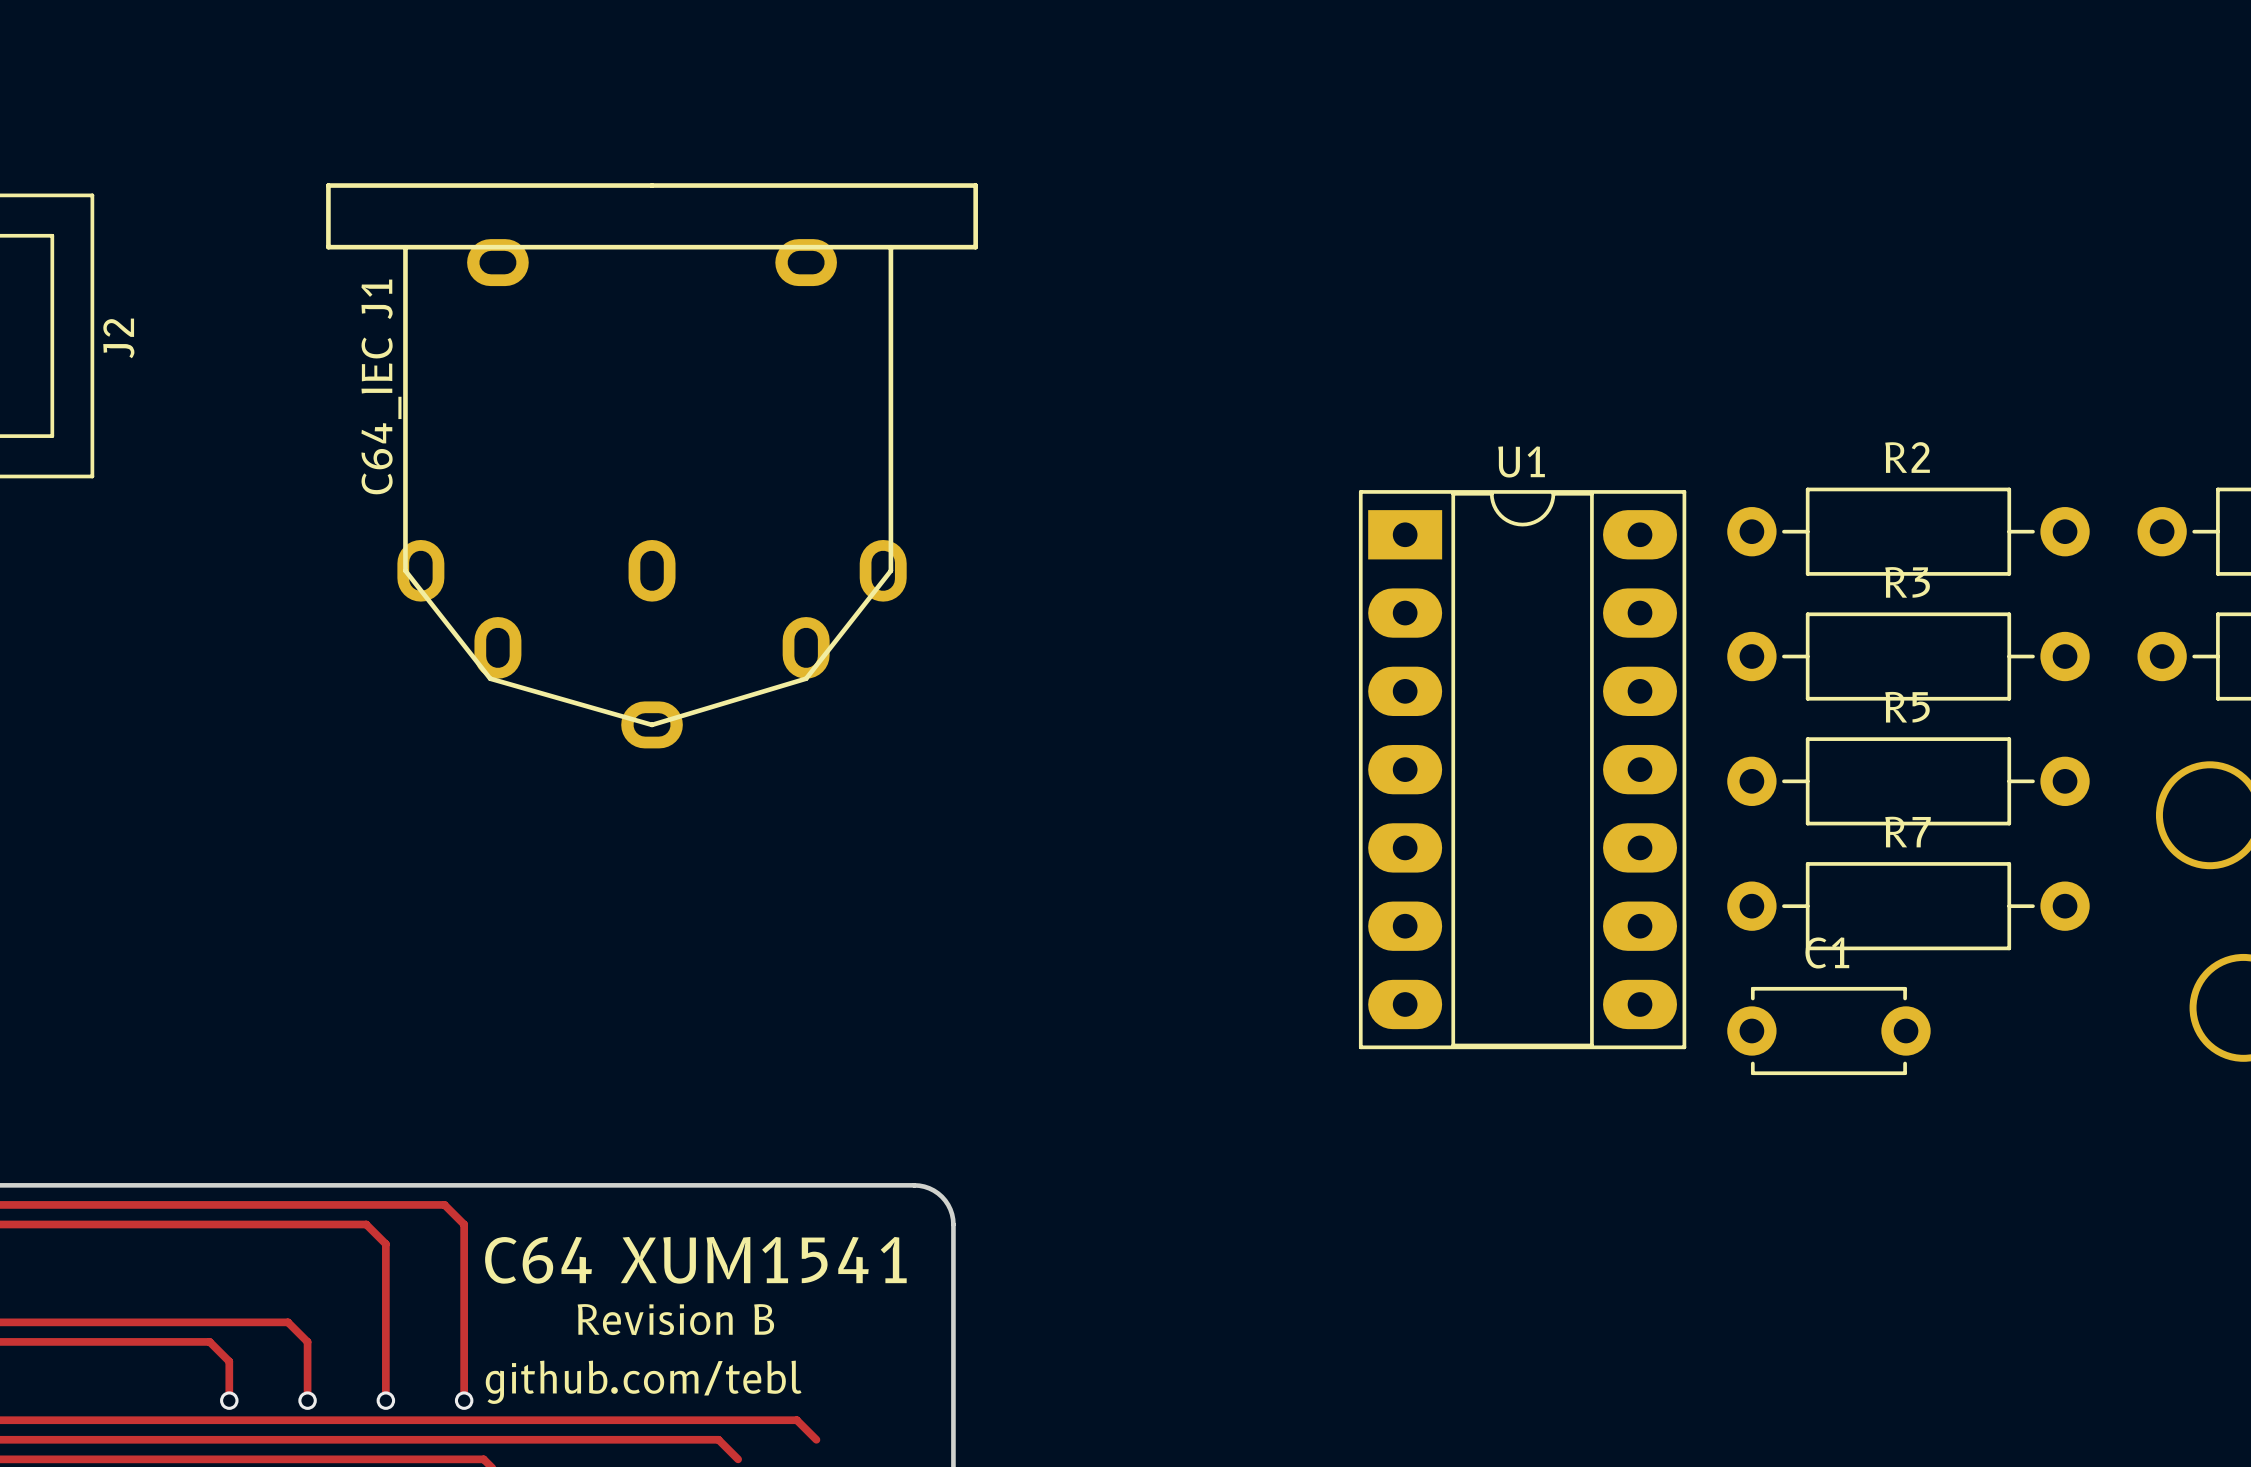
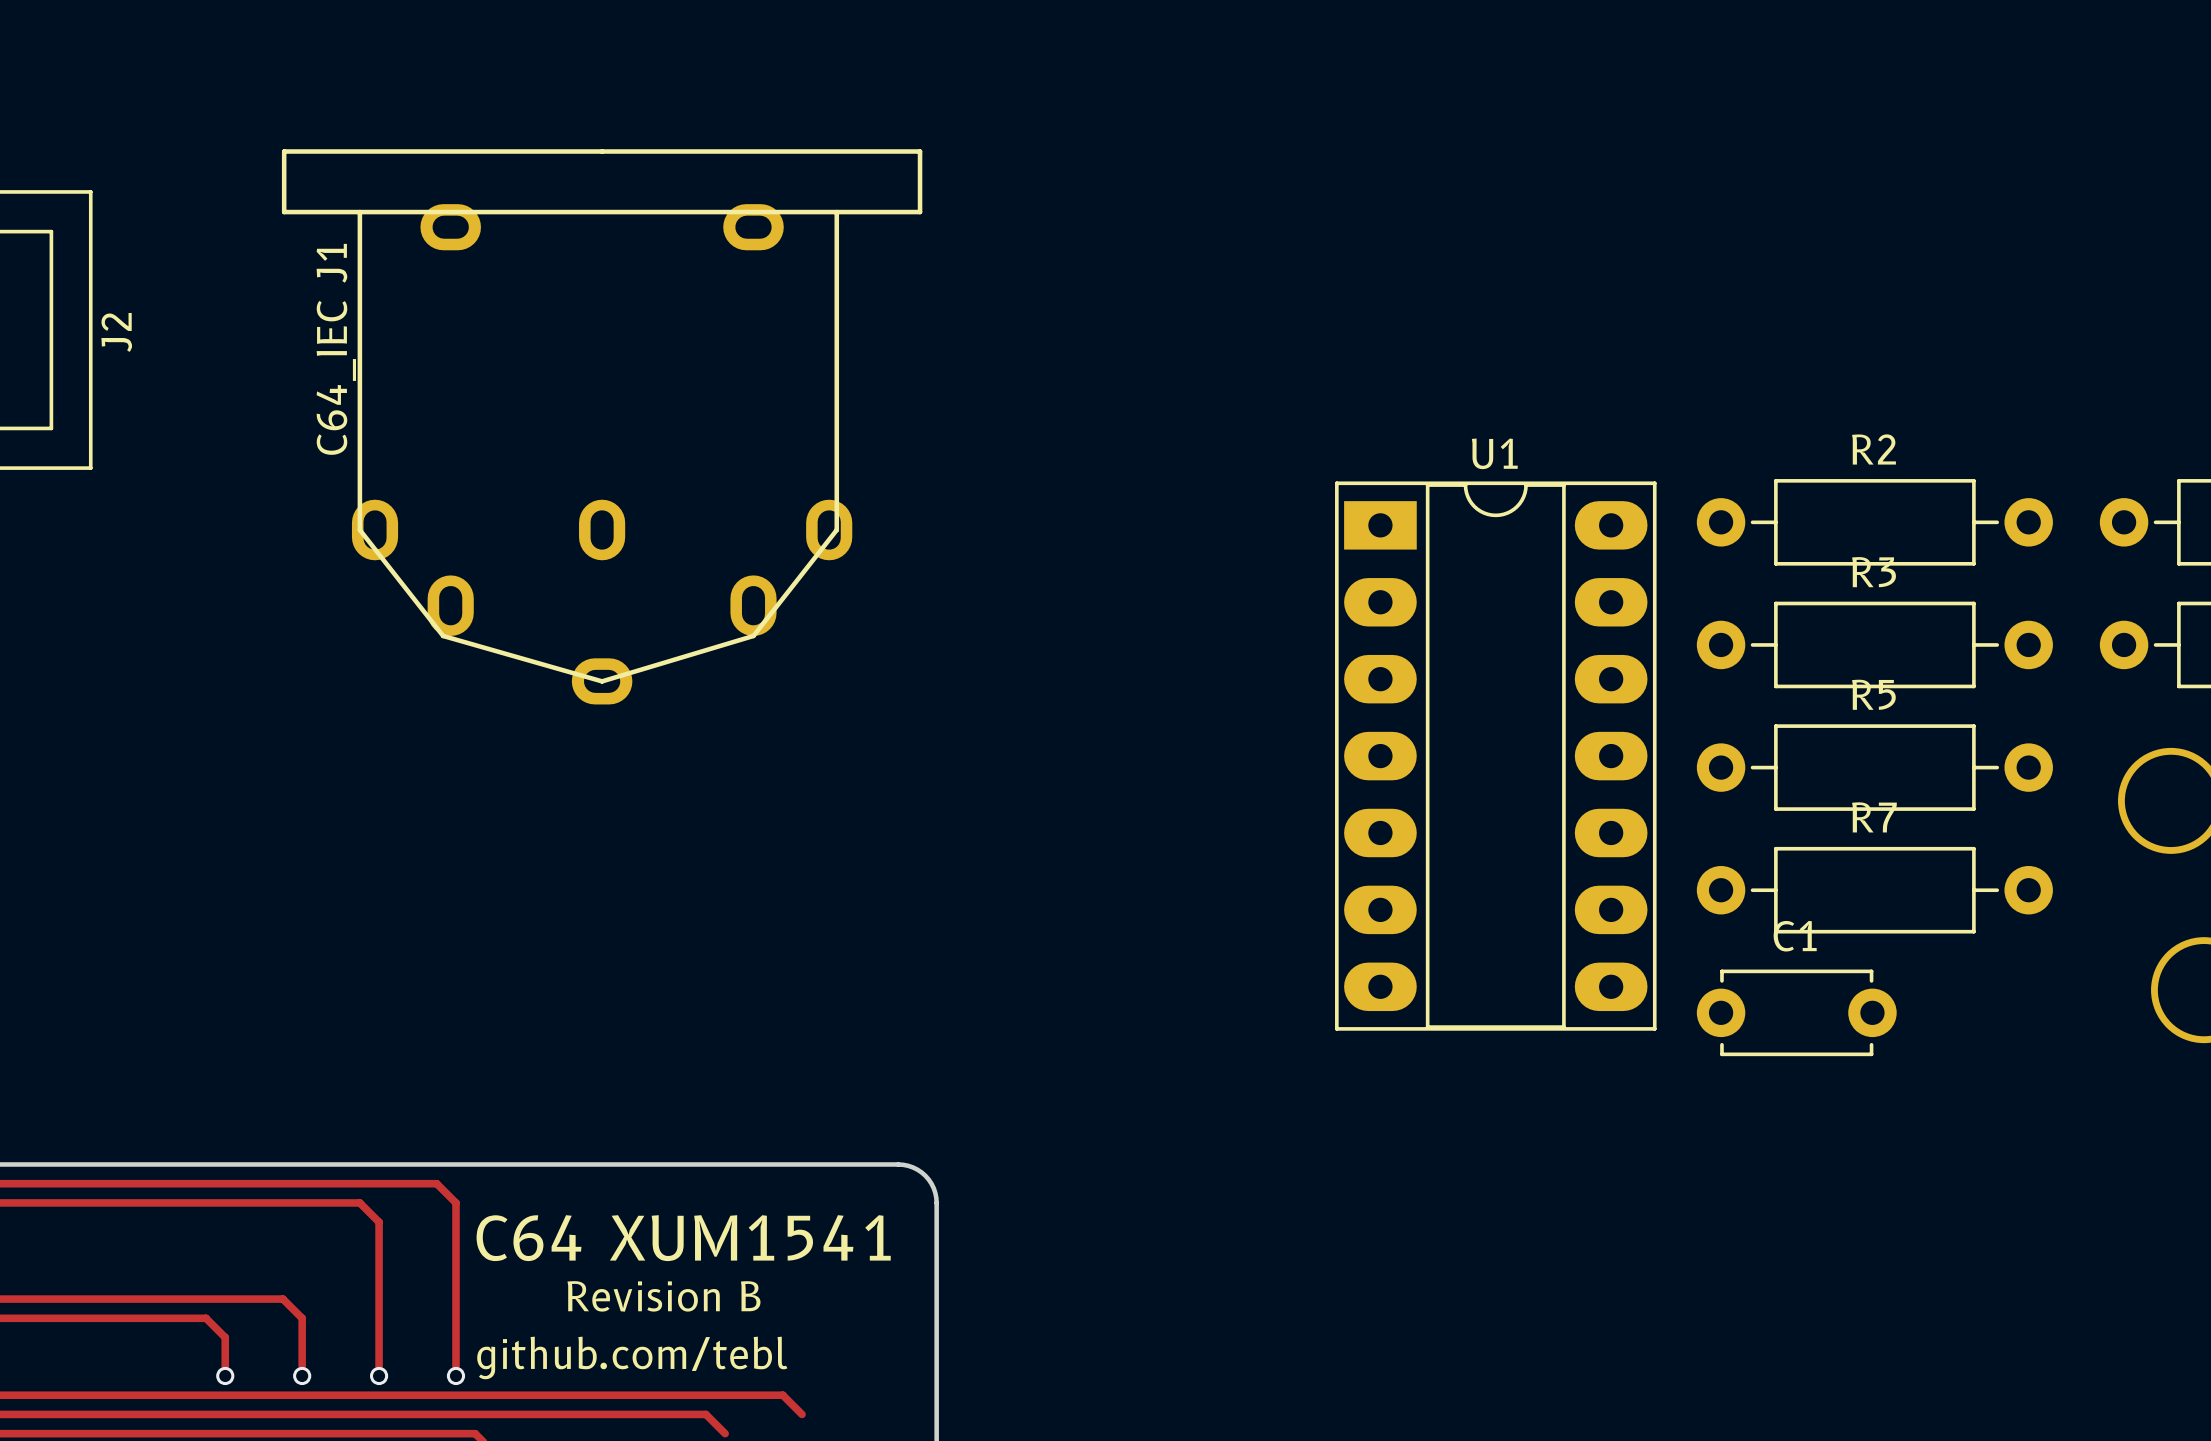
J1 position: (652, 465) -> (602, 426)

